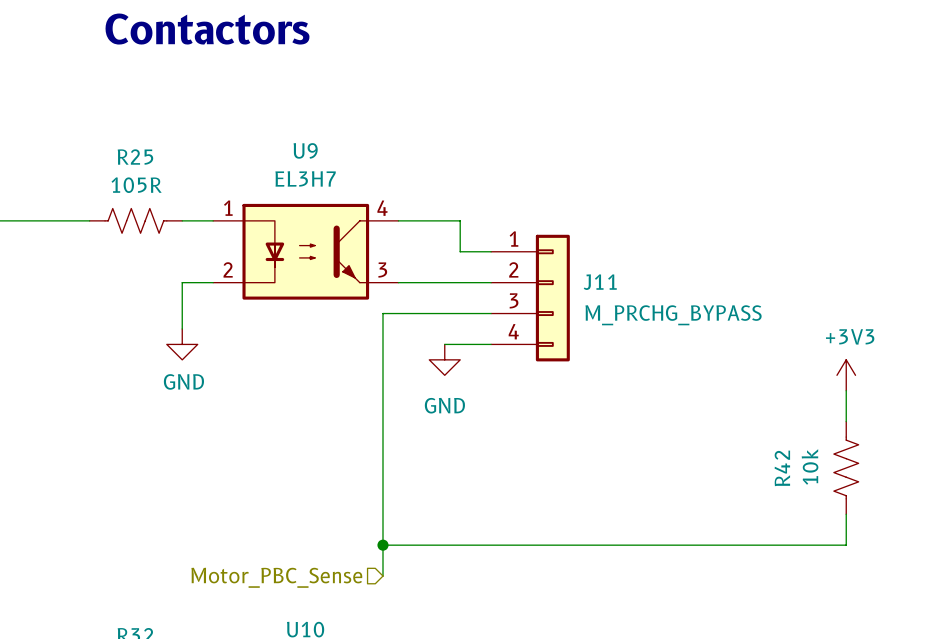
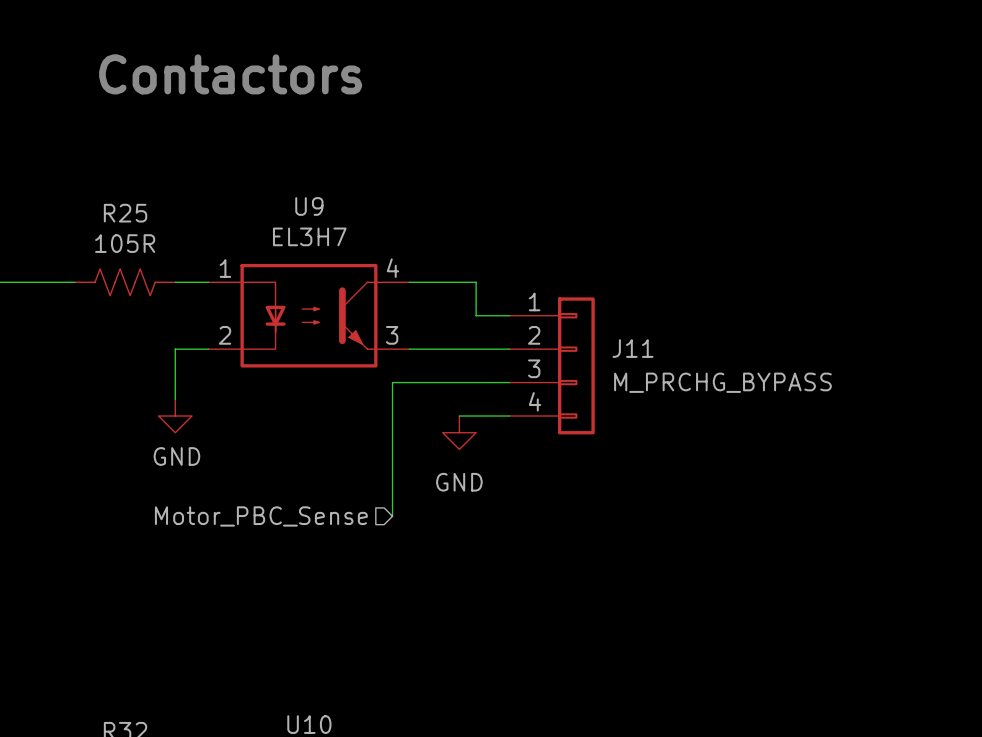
power symbol: +3V3 (846, 375) -> none
wire: (846, 390) (846, 421) -> none
wire: (382, 437) (382, 576) -> none
R42: 10k (846, 467) -> none
wire: (846, 514) (846, 545) (382, 545) -> none
junction: (382, 545) -> none
hierarchical label position: Motor_PBC_Sense (276, 577) -> Motor_PBC_Sense (261, 516)

